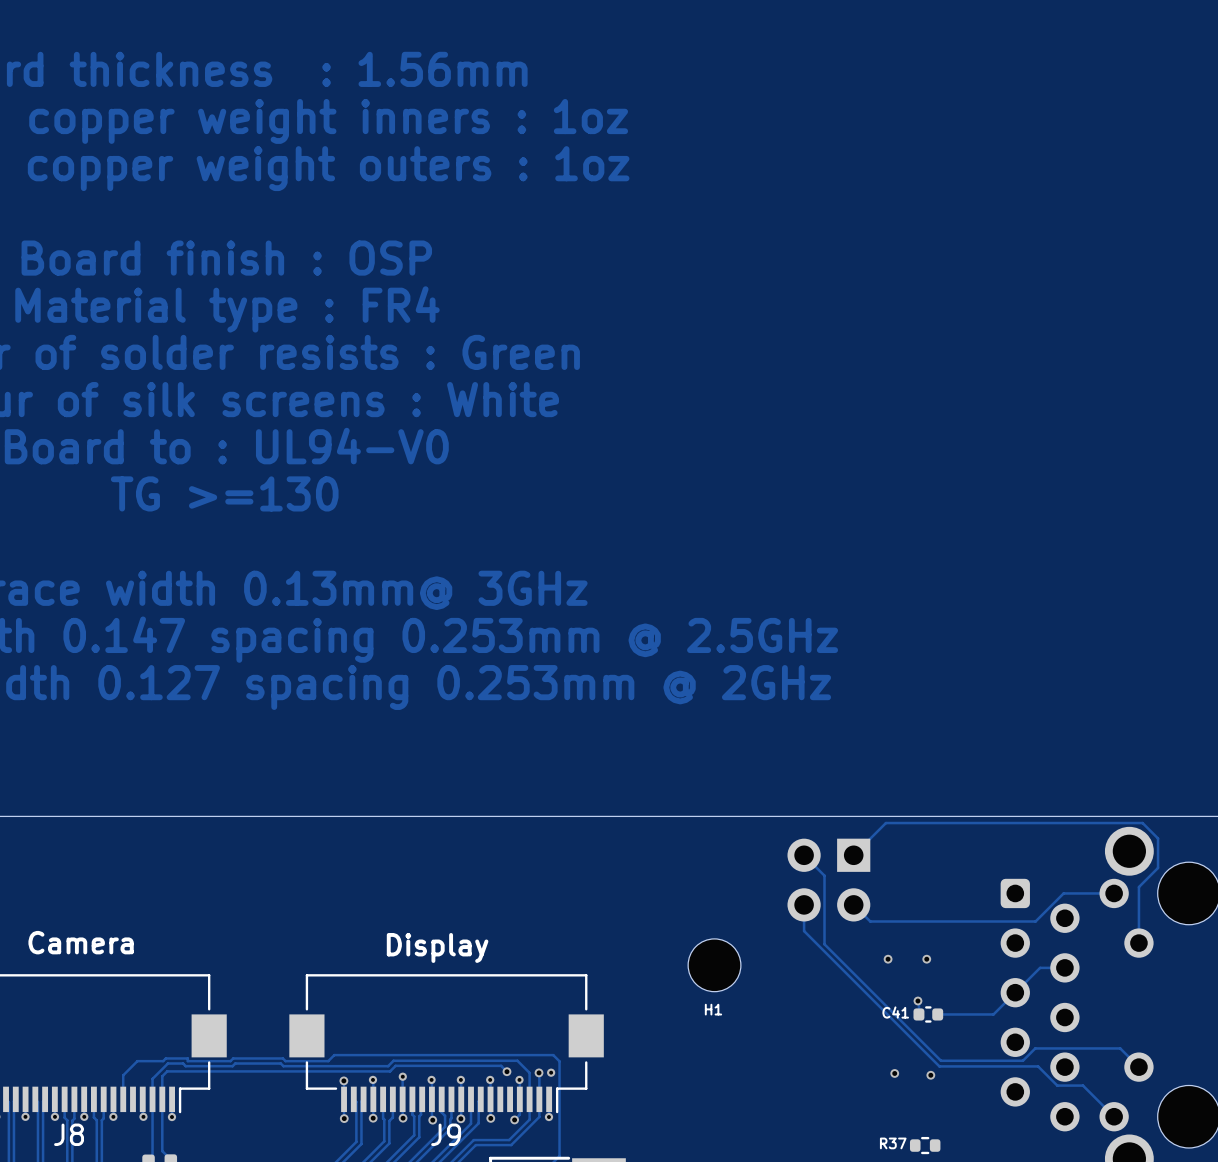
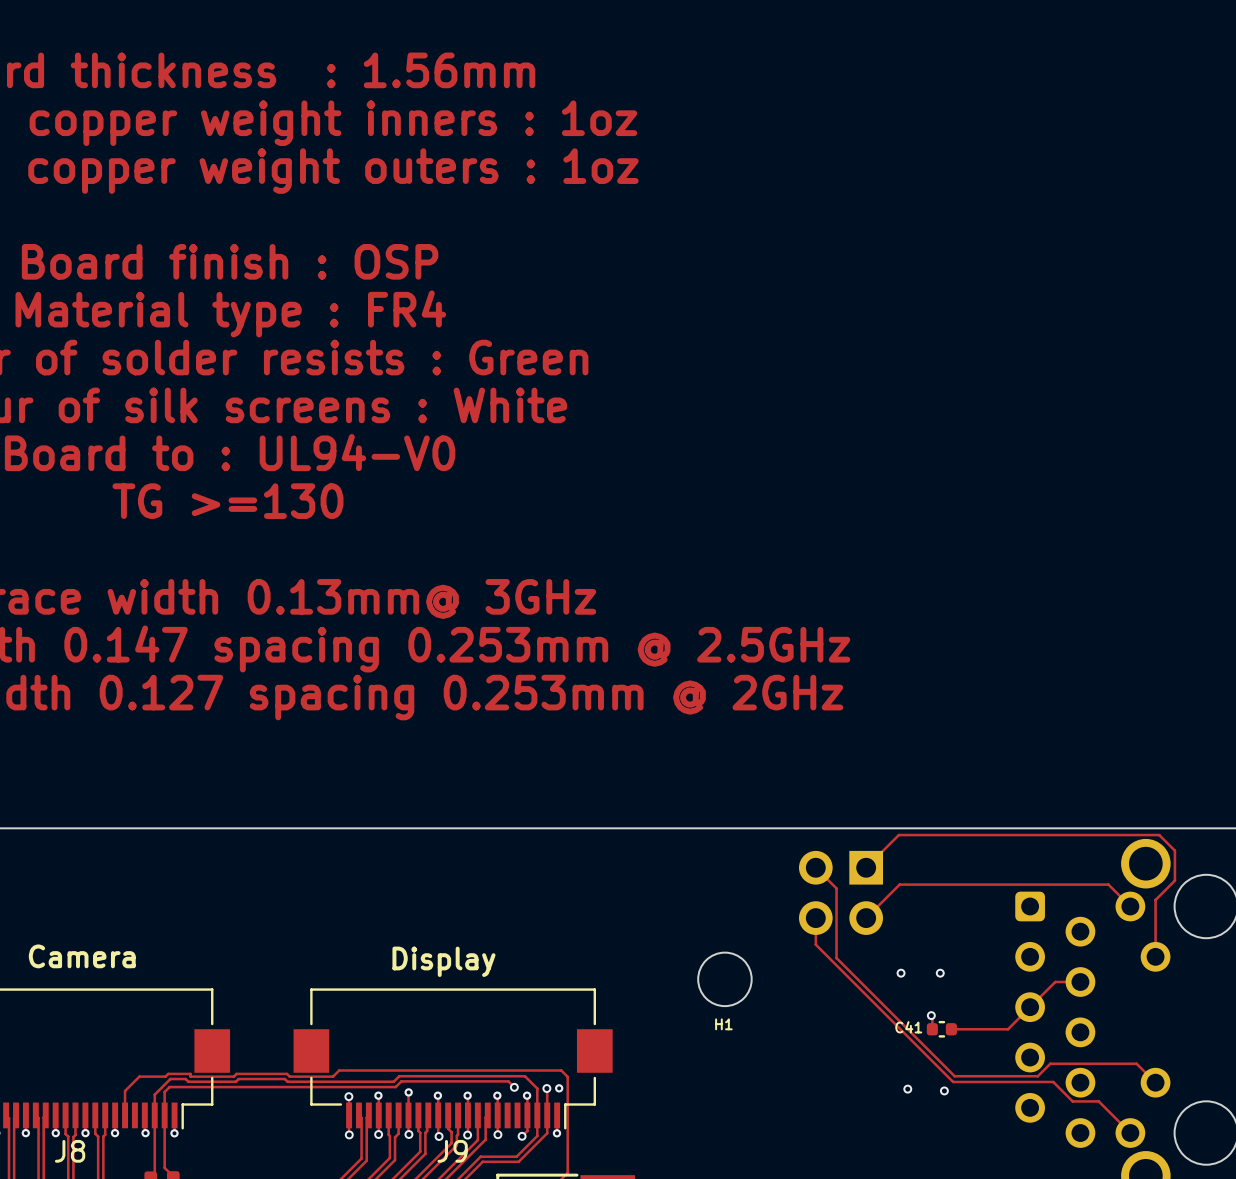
track: (1114, 893) (1063, 893) (1035, 921) (870, 921) (853, 904) -> (1130, 906) (1108, 884) (899, 884) (866, 918)
R37: (925, 1145) -> none

